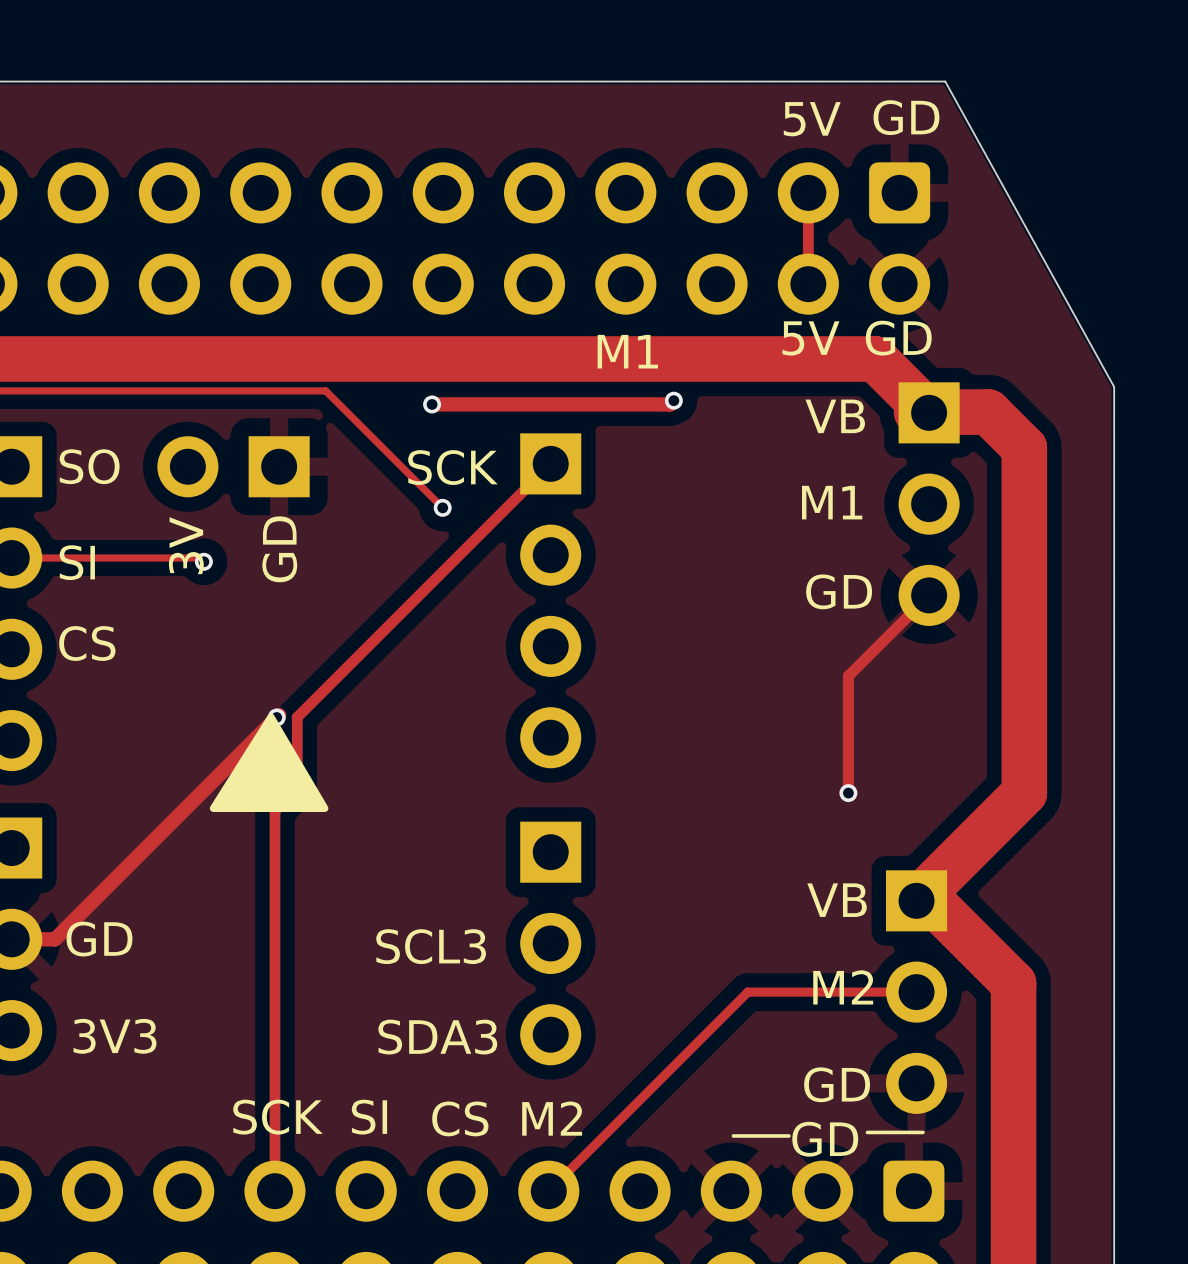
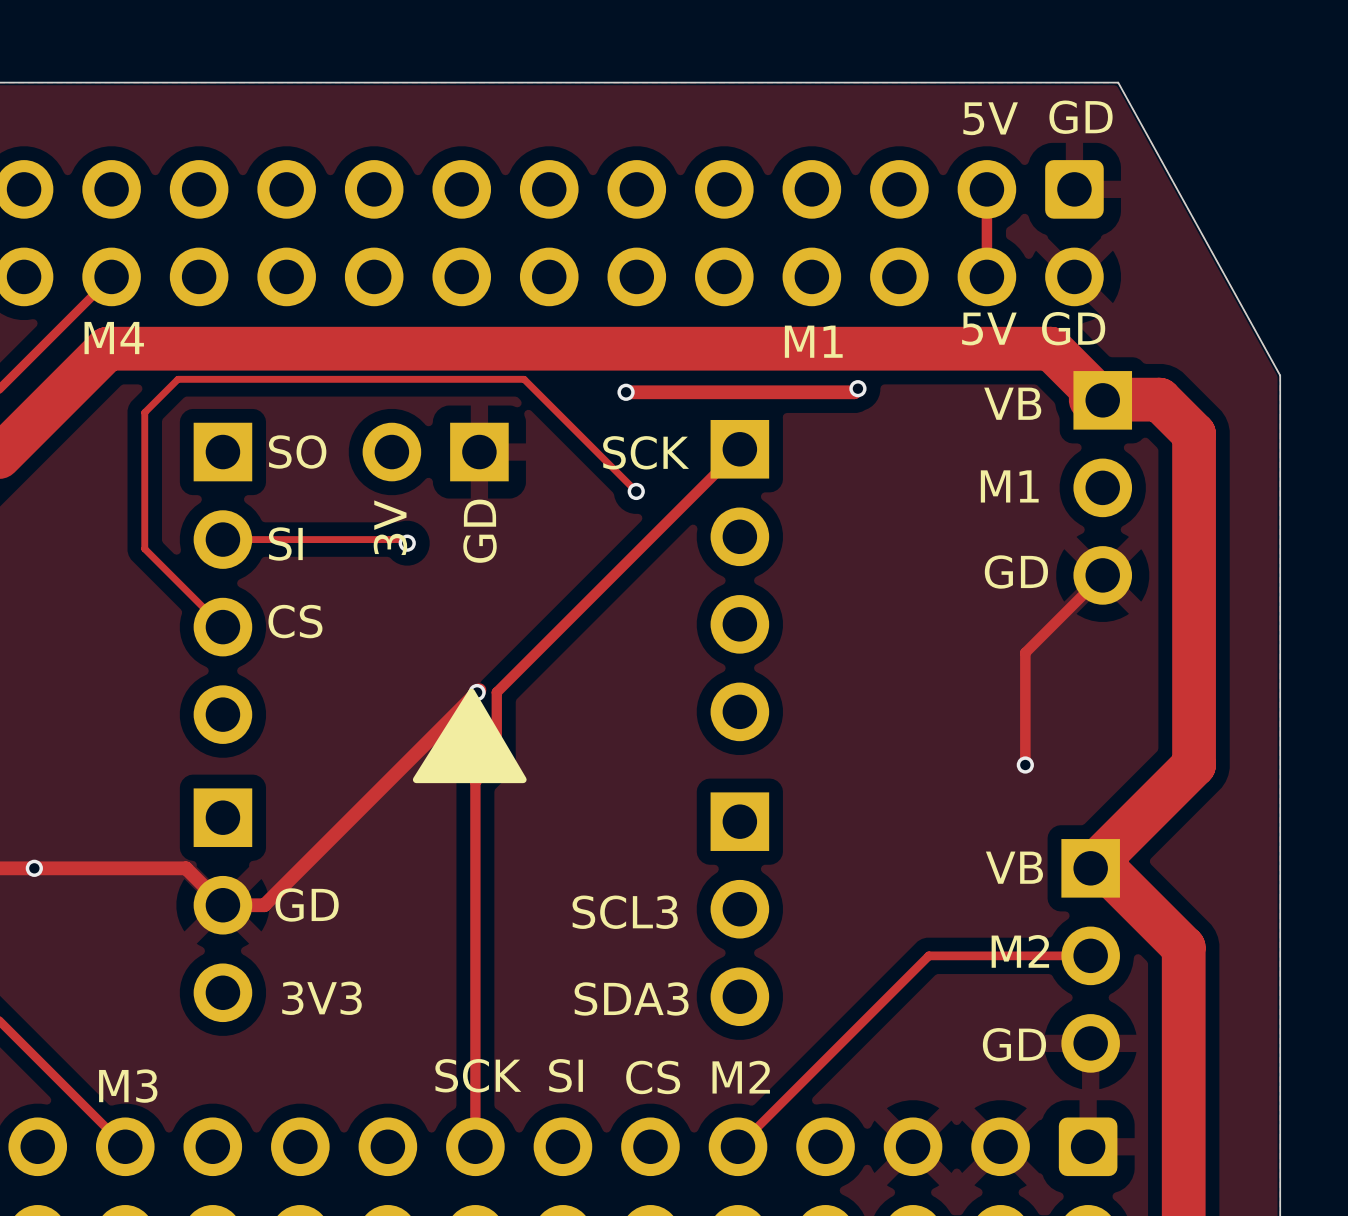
line: (867, 1132) (922, 1132) -> none
line: (733, 1135) (788, 1135) -> none
text: GD (825, 1139) -> none

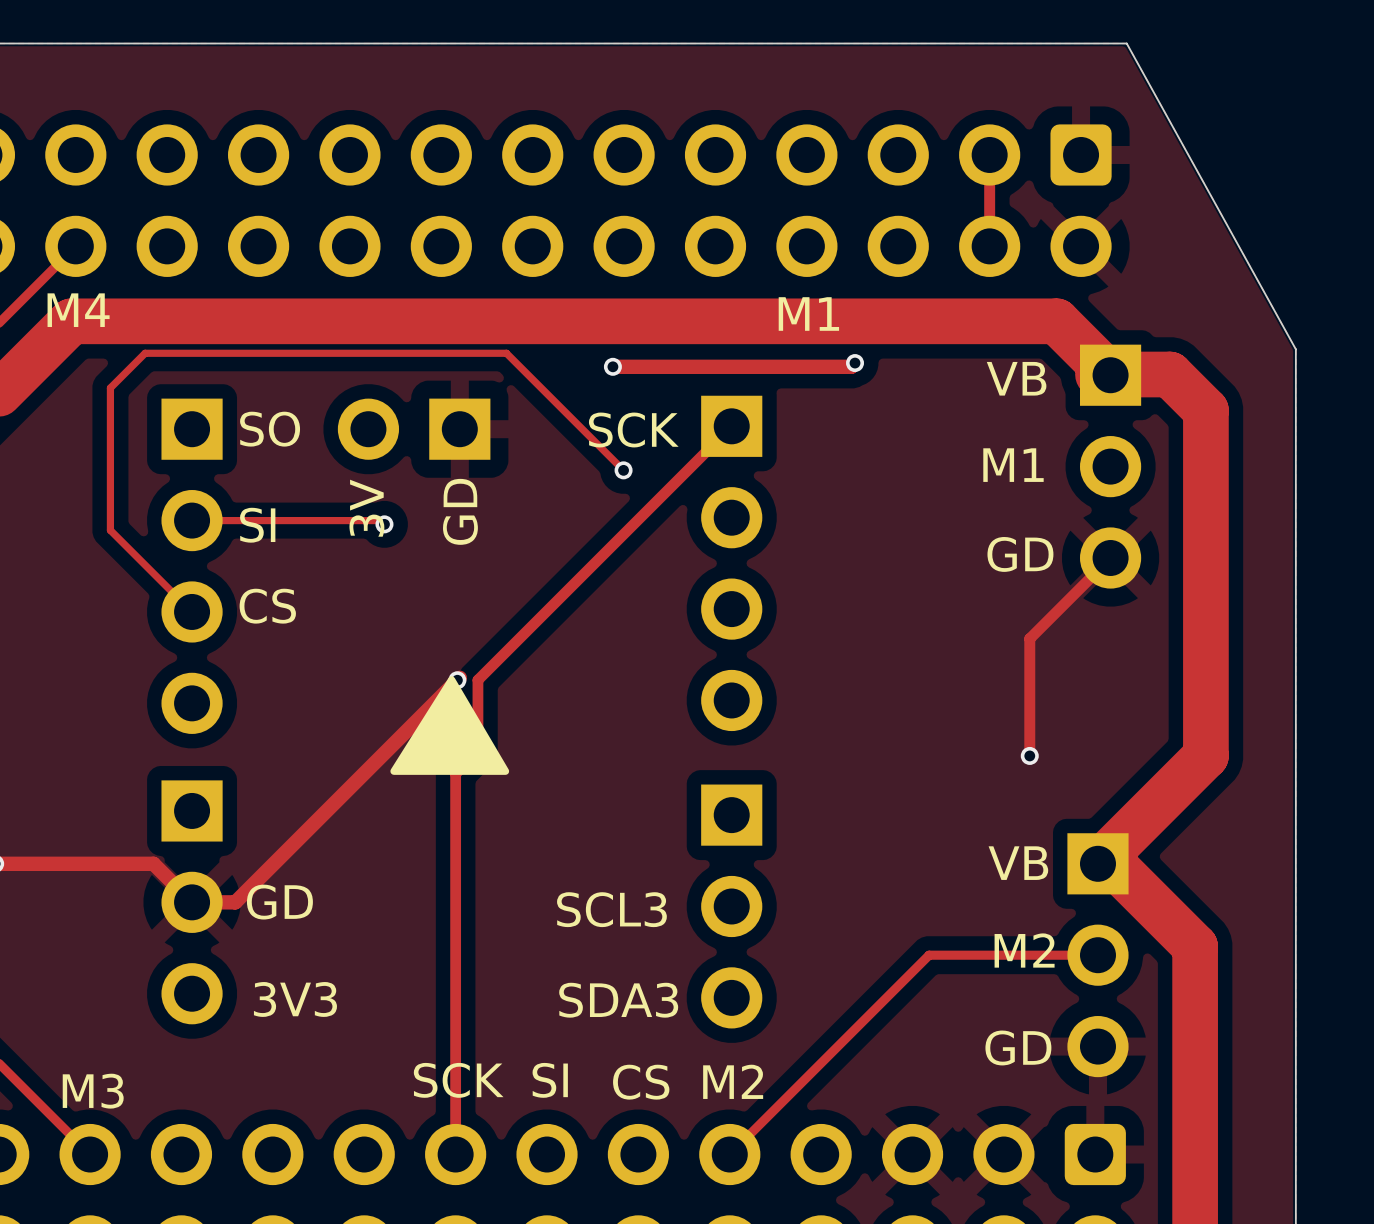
text: GD (1081, 117) -> none
text: 5V (990, 118) -> none
text: 5V (989, 328) -> none
text: GD (1073, 328) -> none

